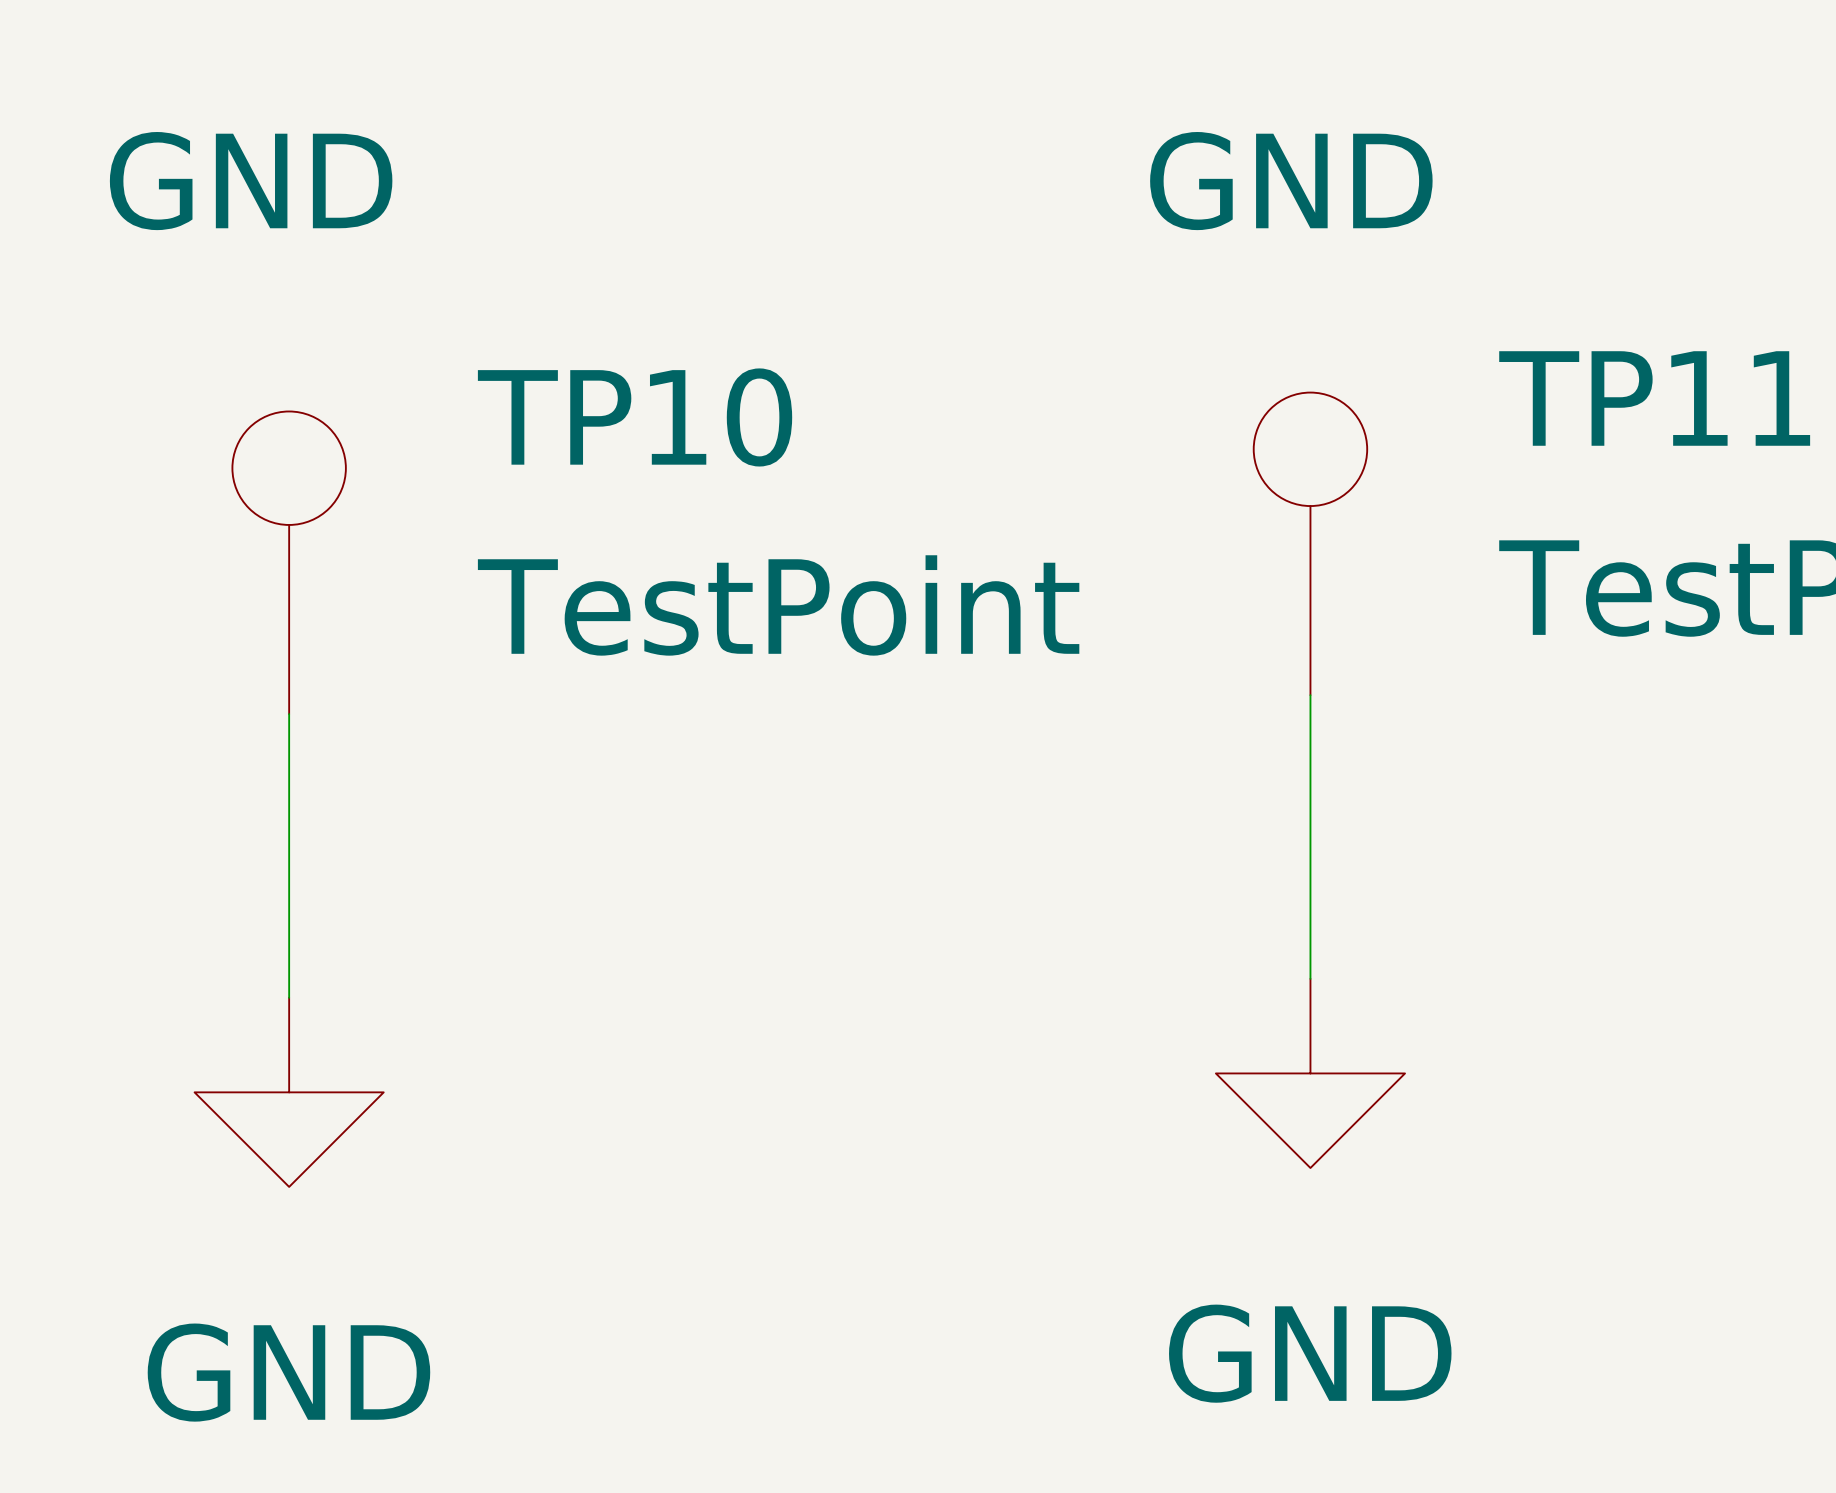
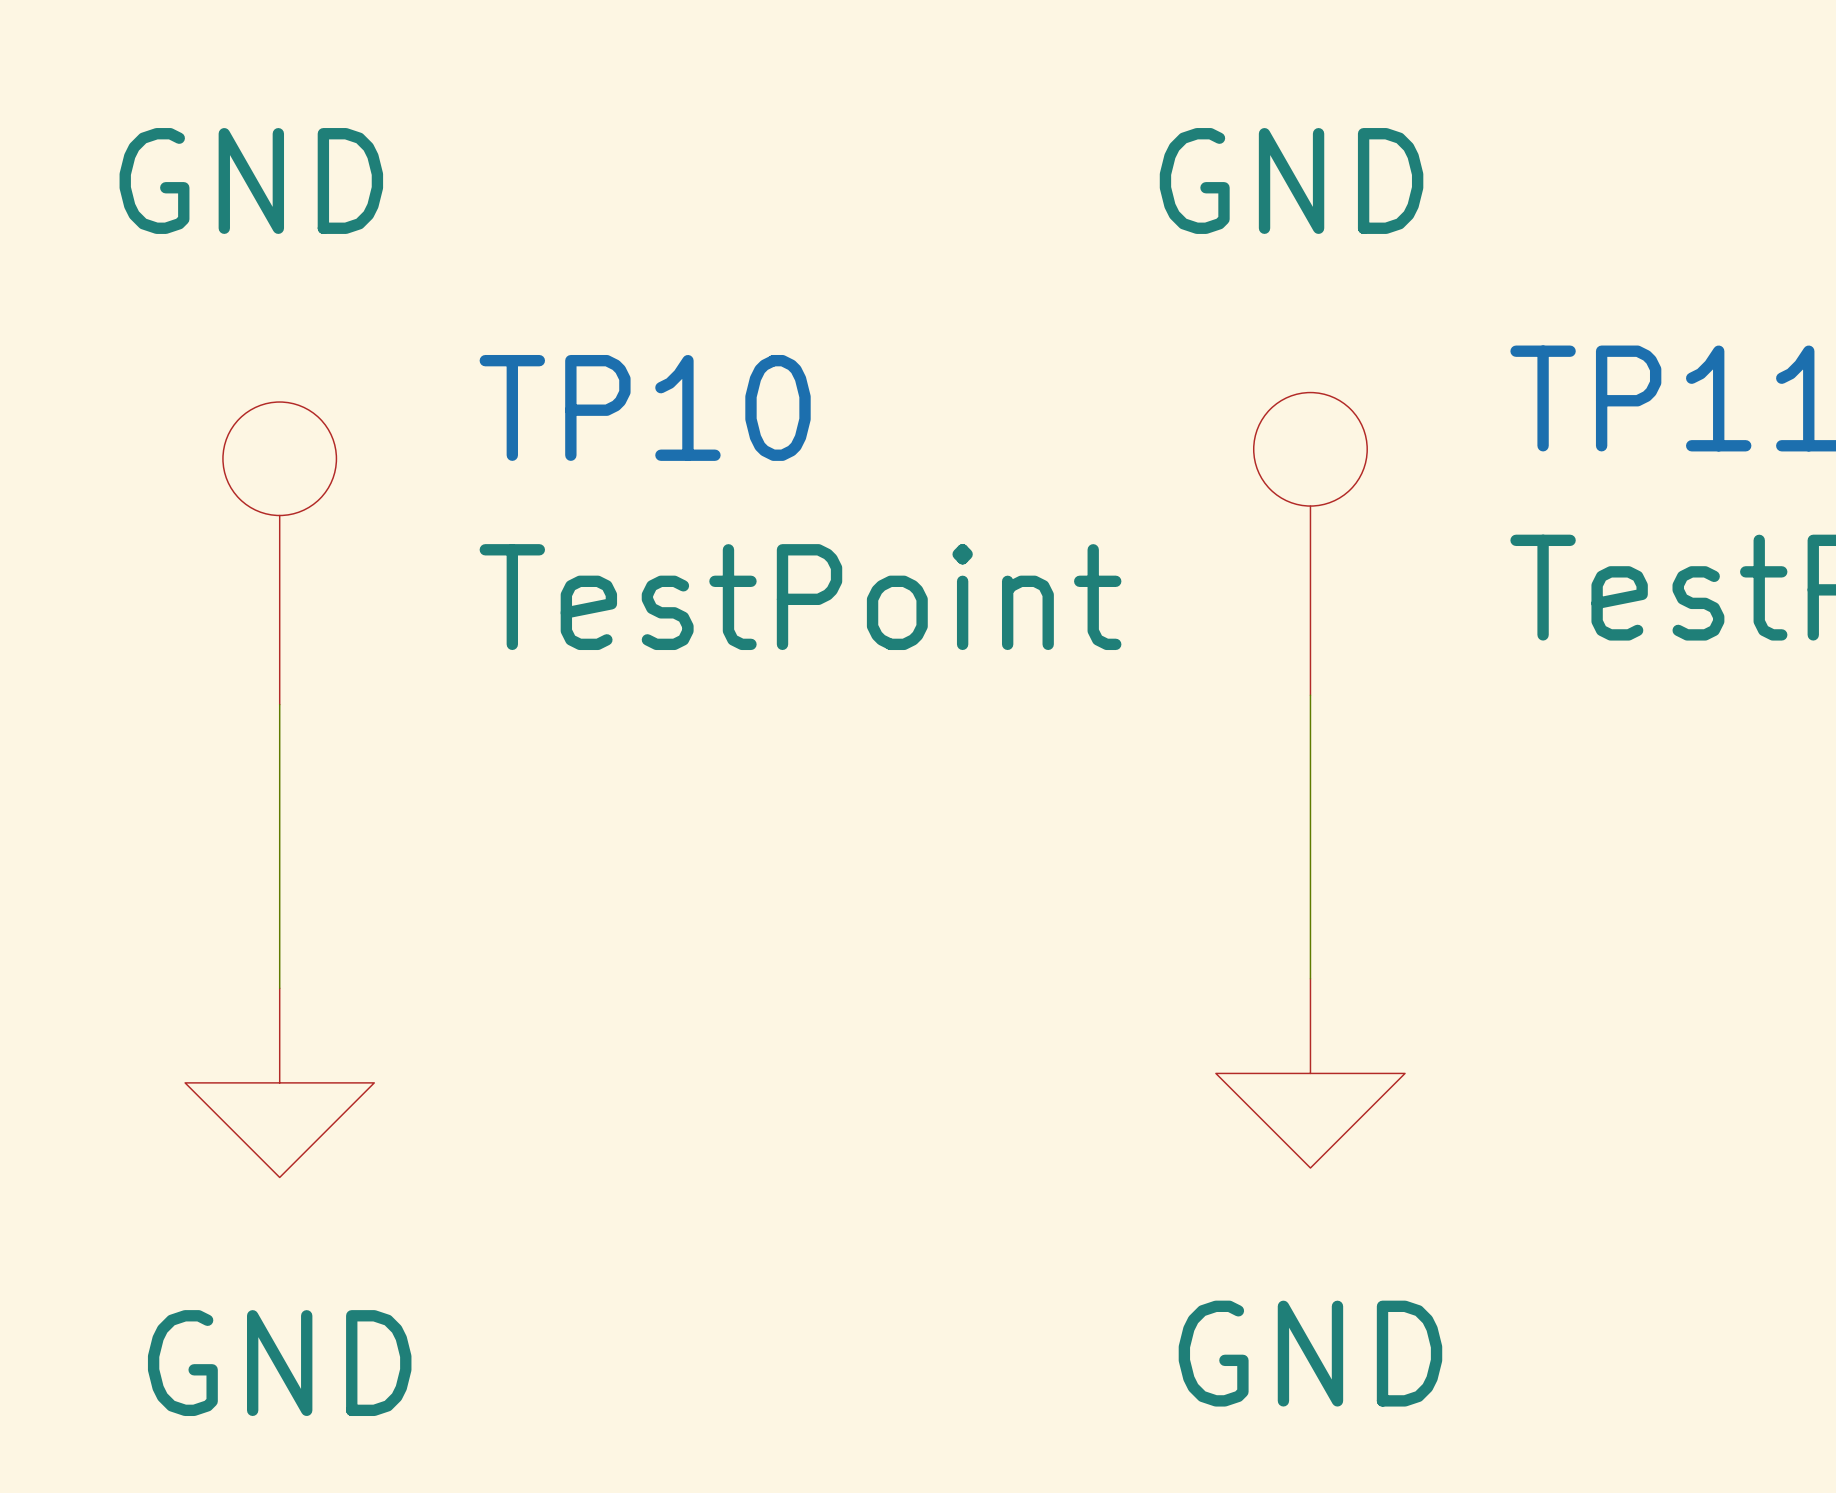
TP10 position: (289, 562) -> (279, 553)
wire: (289, 714) (289, 997) -> (279, 704) (279, 988)
power symbol position: GND (289, 1092) -> GND (279, 1082)

